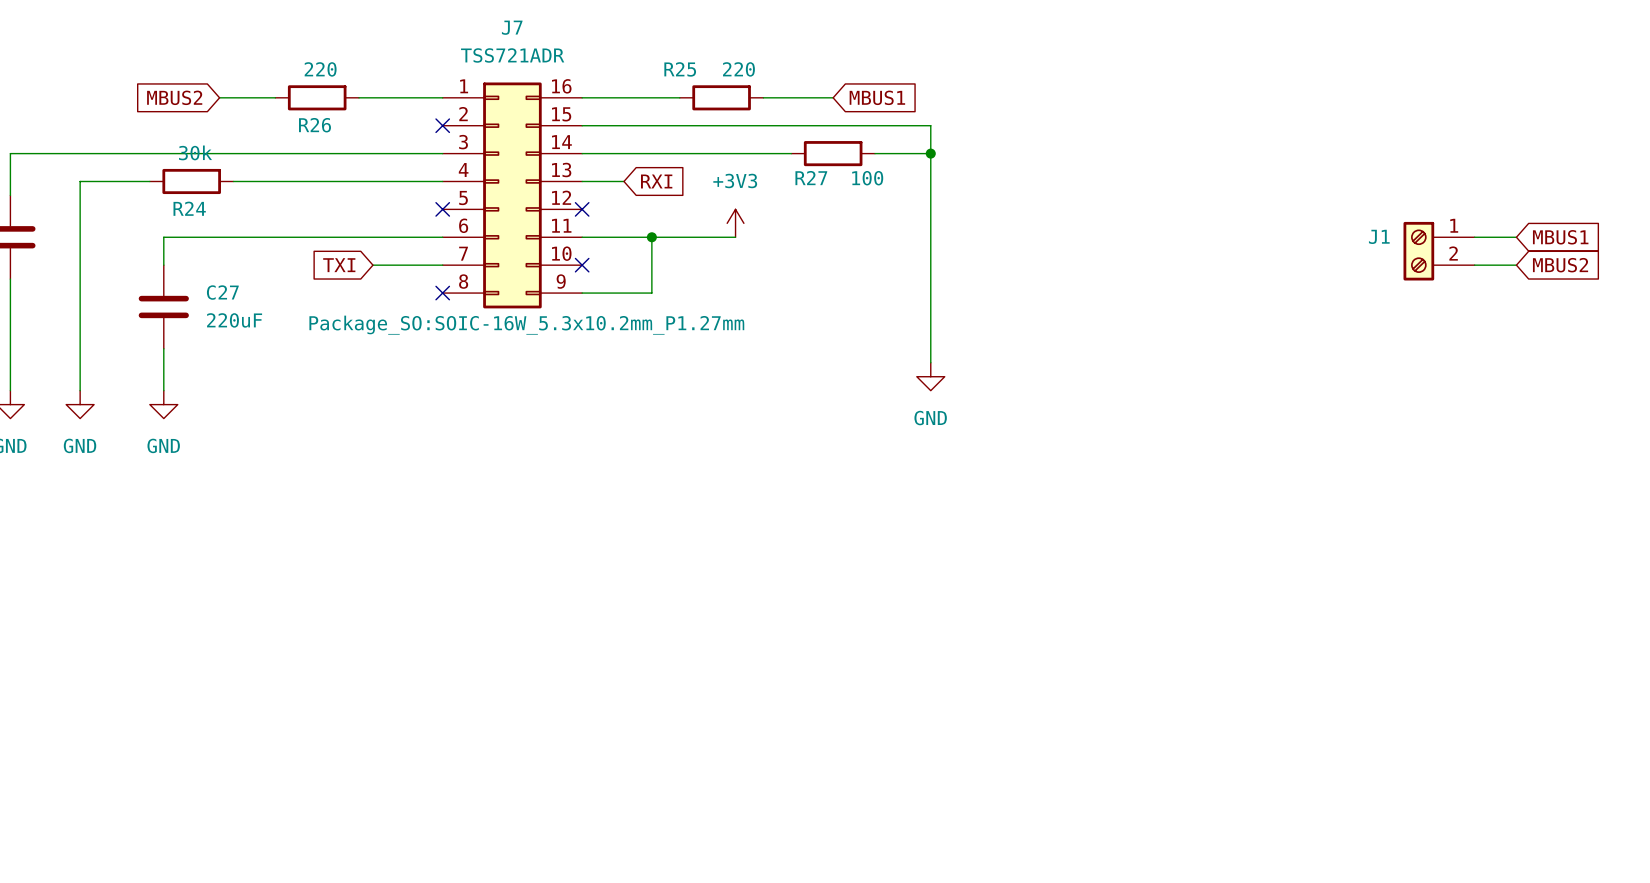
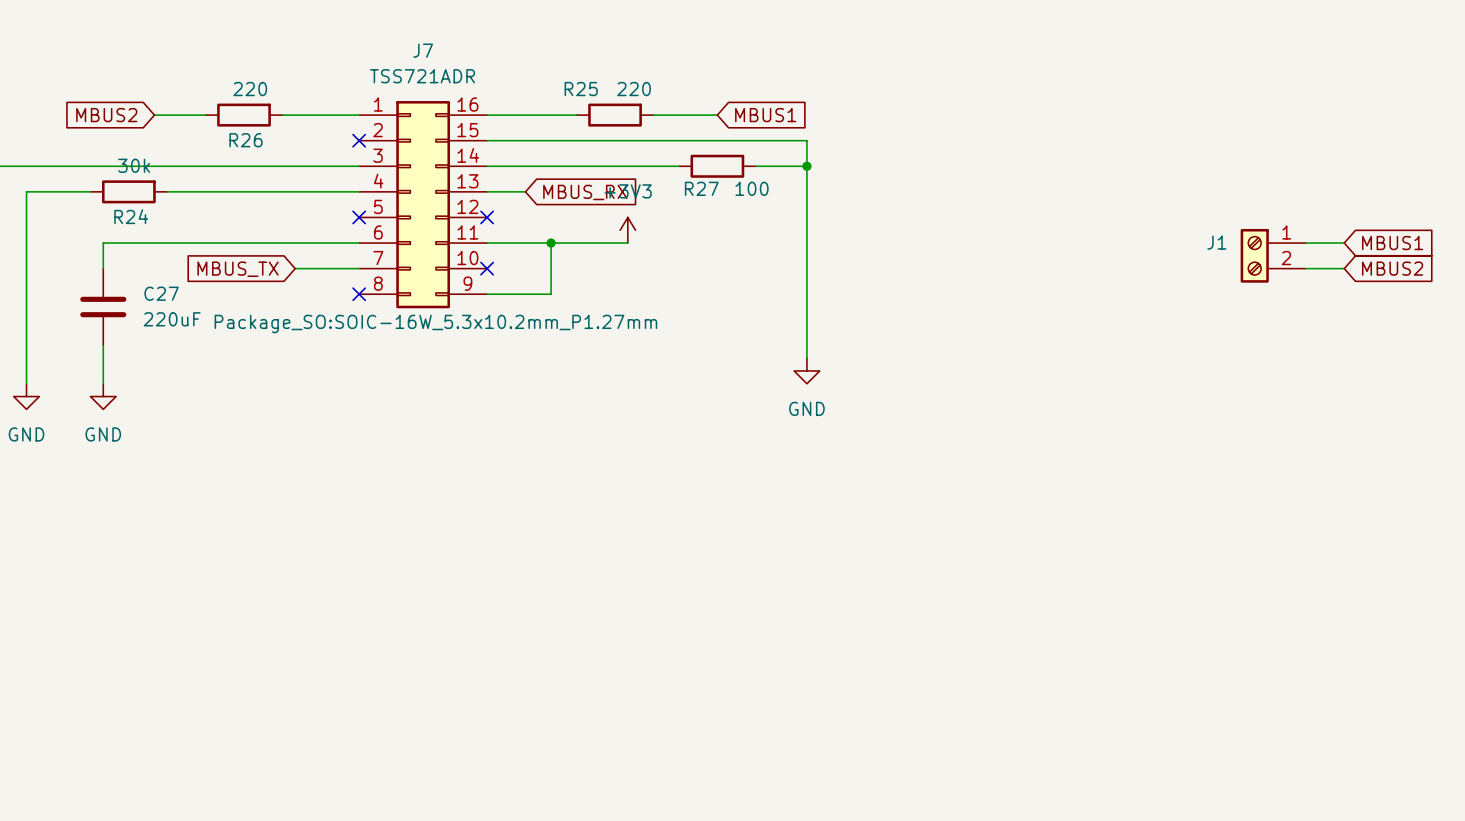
global label: RXI (656, 181) -> MBUS_RX (585, 192)
global label: TXI (339, 265) -> MBUS_TX (238, 269)

